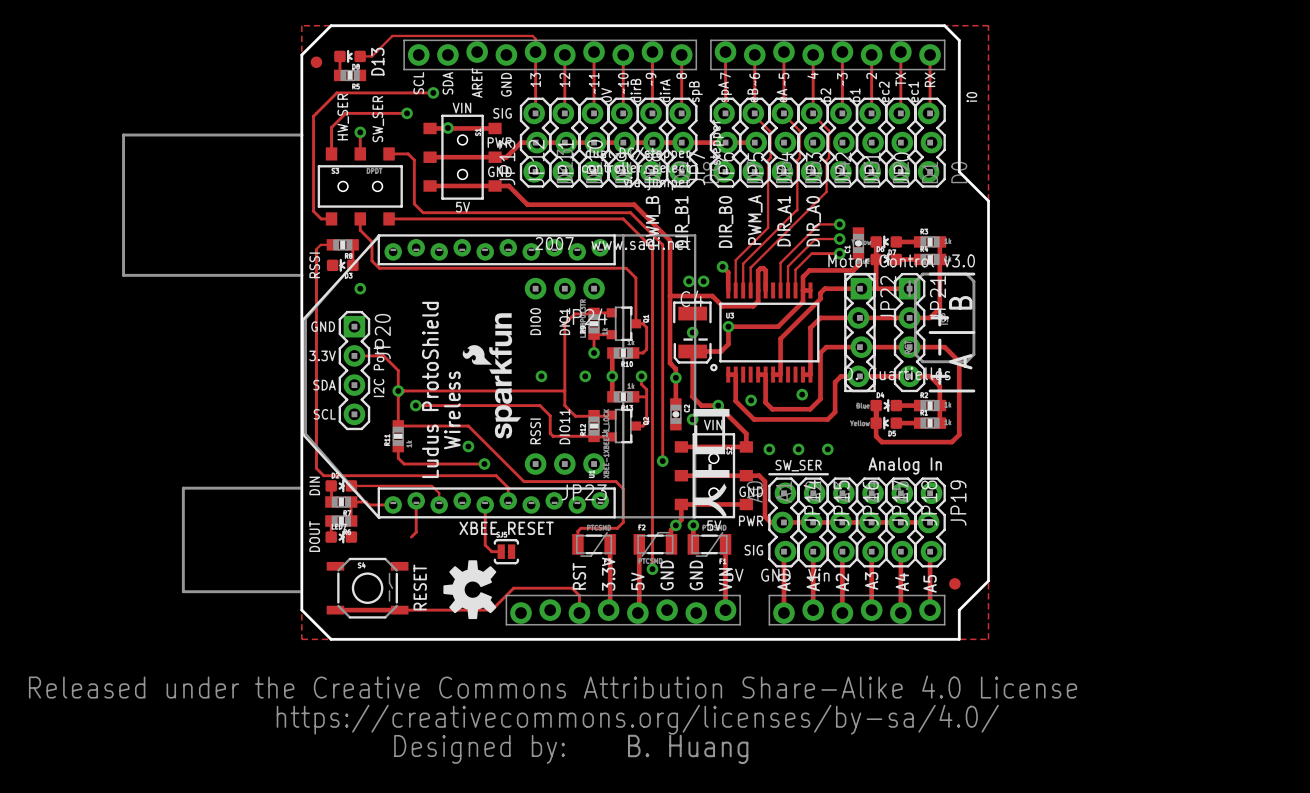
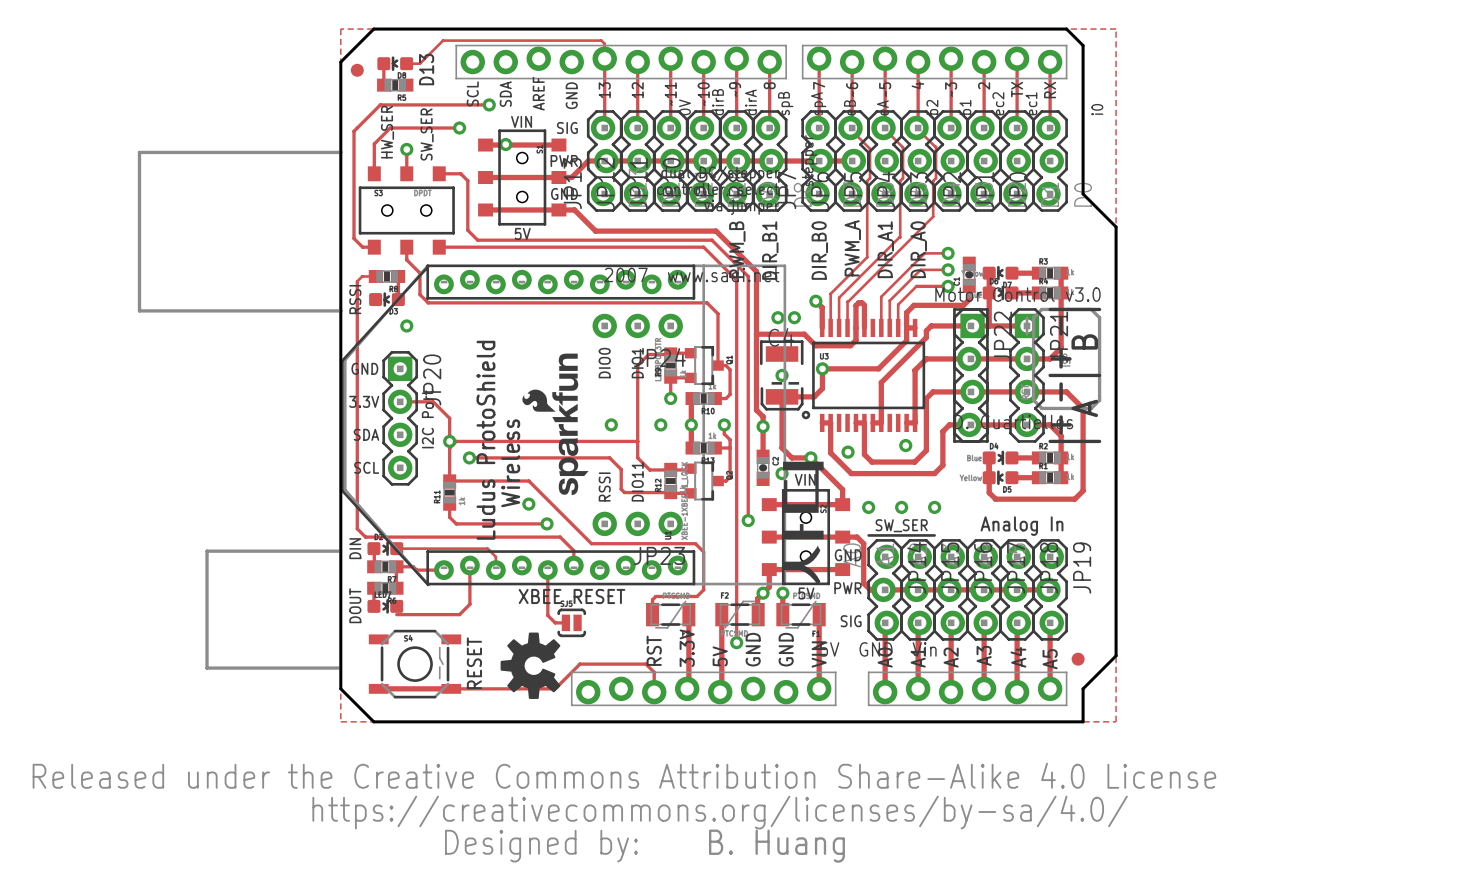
track: (416, 532) (411, 537) -> (469, 600) (469, 604) (459, 614) (396, 614)

